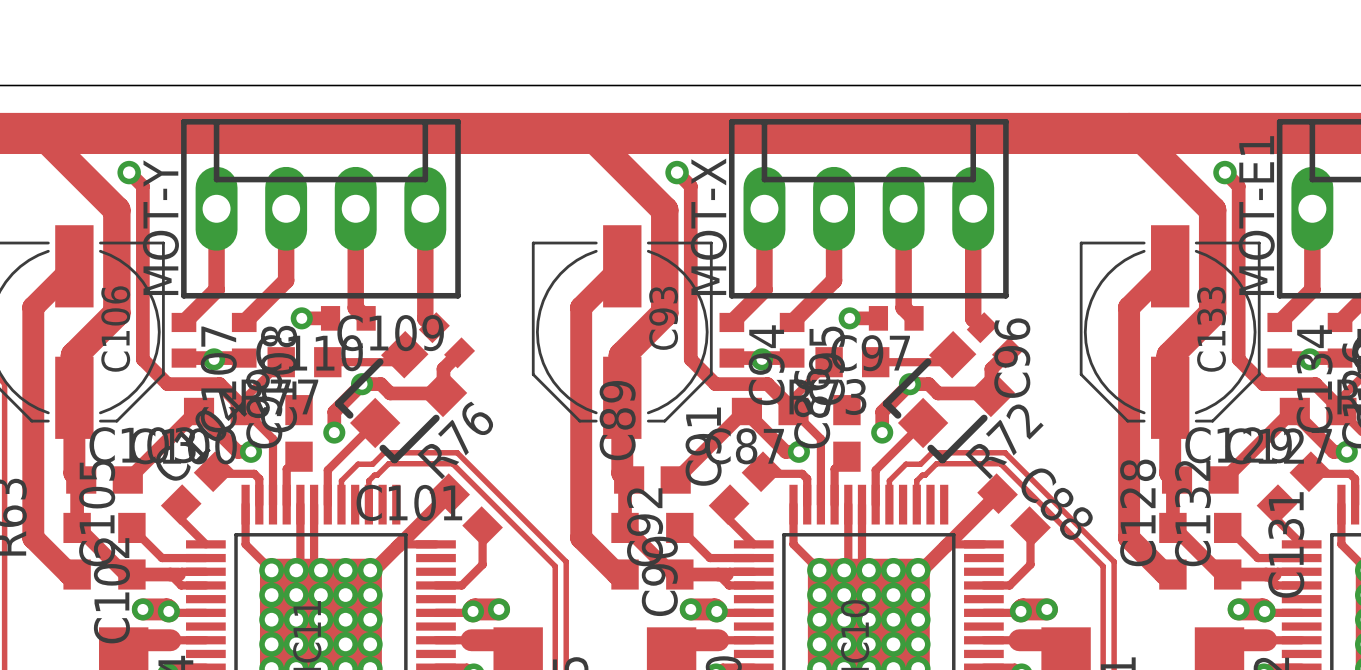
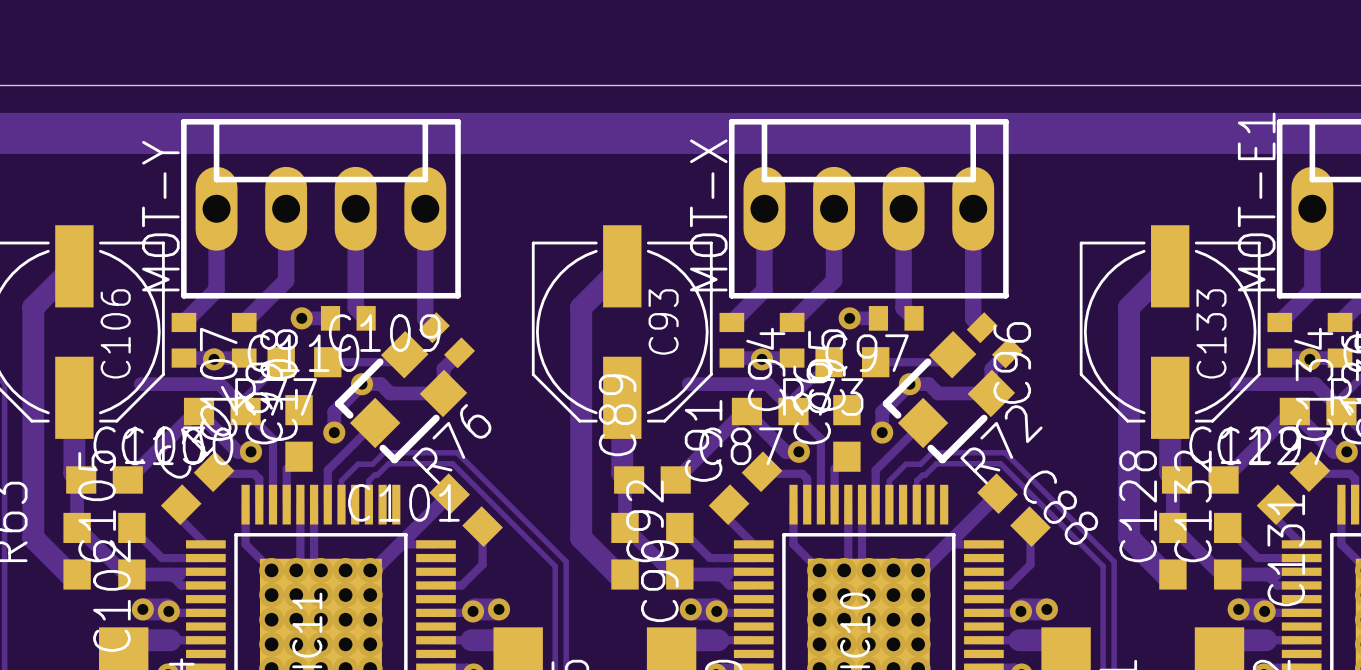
track: (33, 133) (40, 133) (116, 210) (116, 313) (74, 355) (74, 397) -> none
track: (581, 133) (588, 133) (664, 210) (664, 313) (622, 355) (622, 397) -> none
track: (1129, 133) (1135, 133) (1212, 210) (1212, 313) (1170, 355) (1170, 397) -> none
track: (129, 172) (142, 186) (142, 359) (167, 384) -> (140, 384) (167, 384)
via: (129, 172) -> none
track: (677, 172) (690, 186) (690, 359) (715, 384) -> (688, 384) (715, 384)
via: (677, 172) -> none
track: (1224, 172) (1238, 186) (1238, 359) (1263, 384) -> (1236, 384) (1263, 384)
via: (1224, 172) -> none

